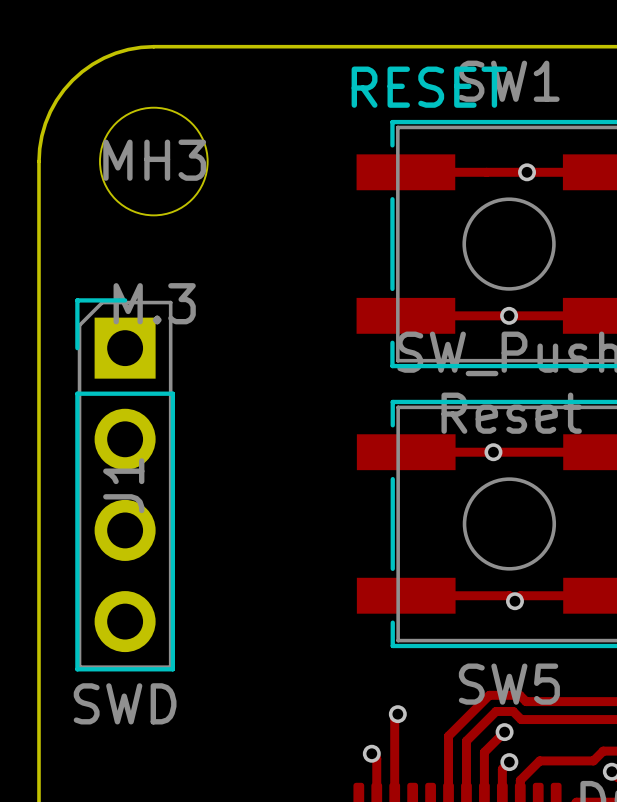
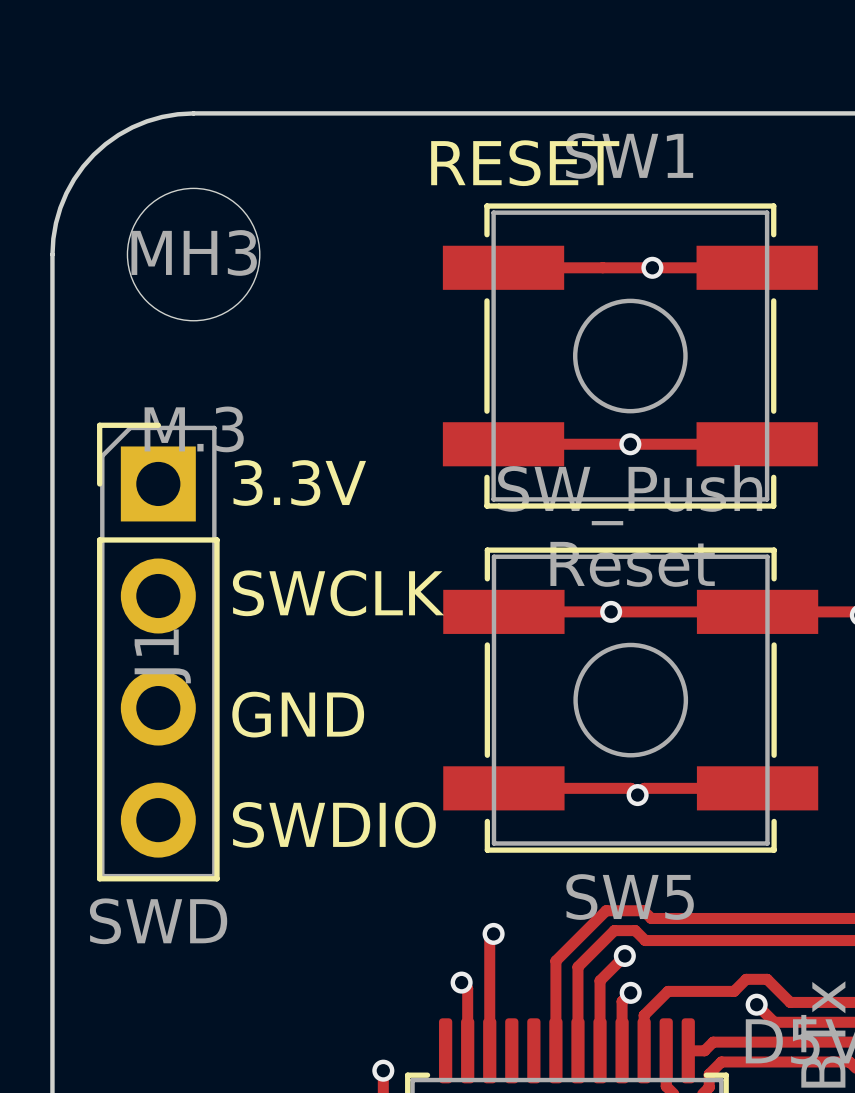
text: none -> 3.3V (299, 483)
text: none -> SWCLK (338, 593)
text: none -> GND (298, 714)
text: none -> SWDIO (334, 824)

